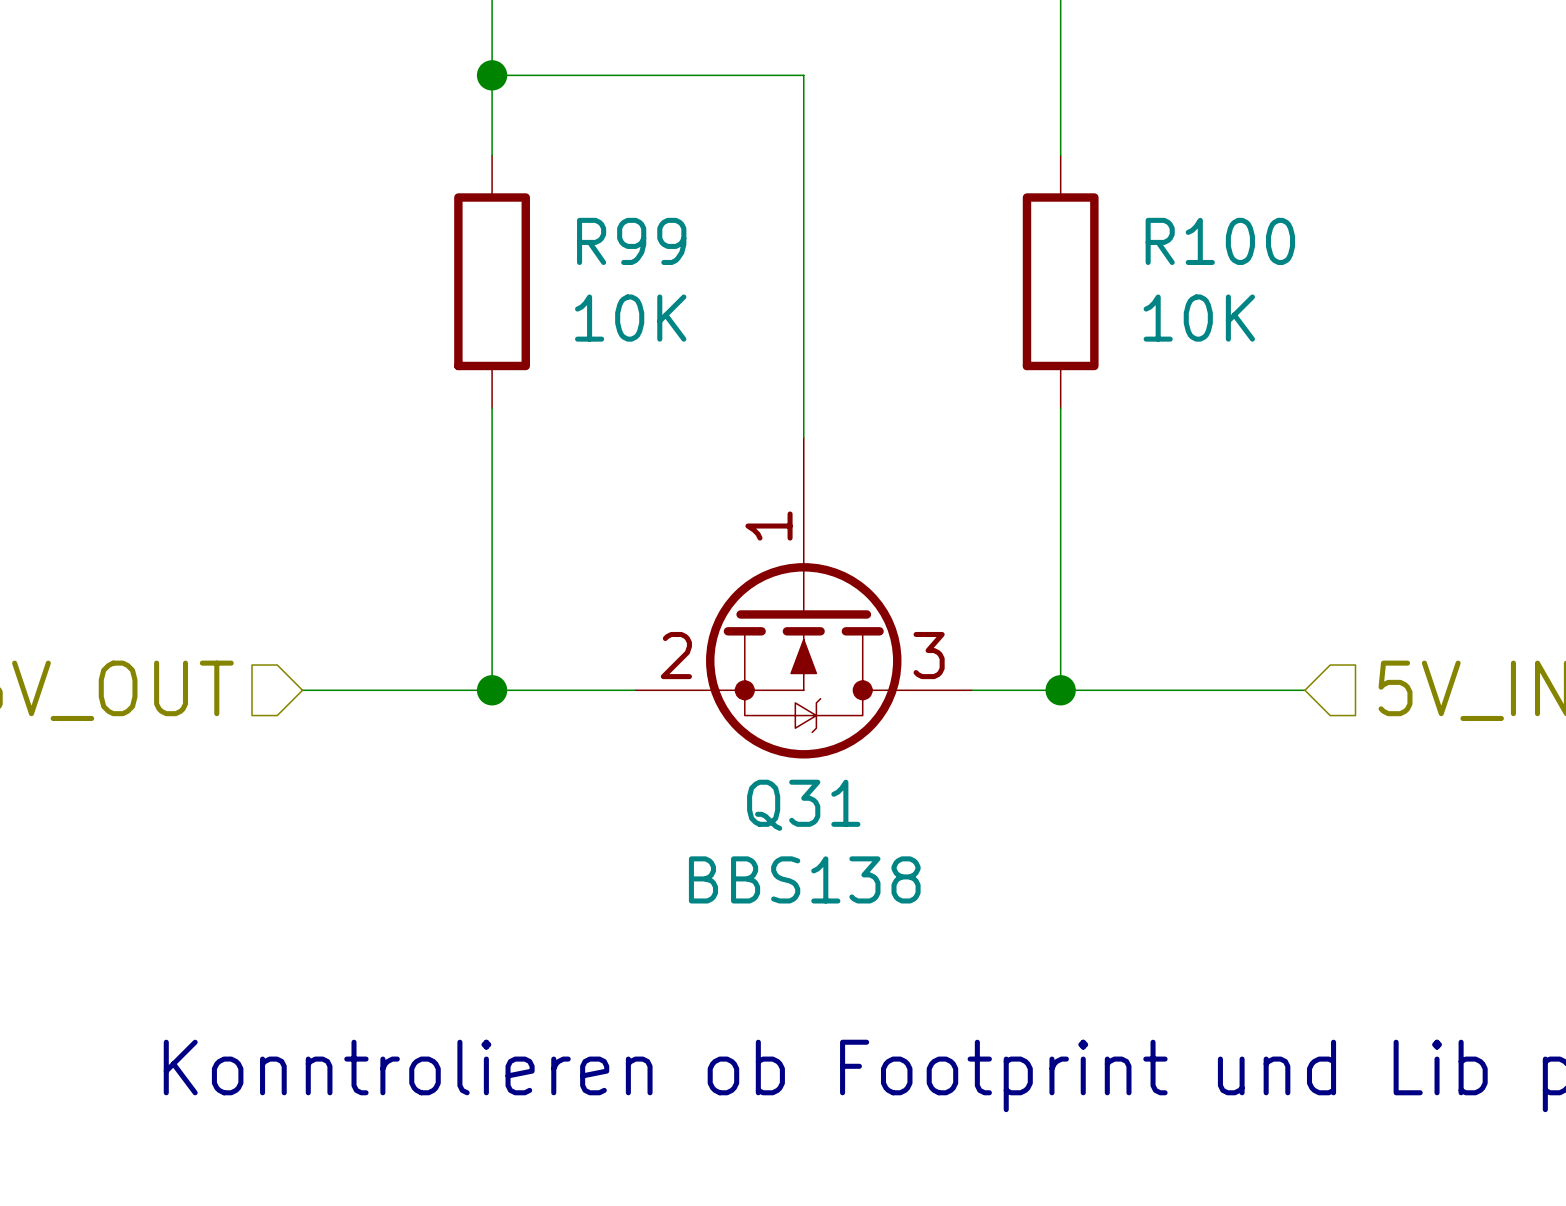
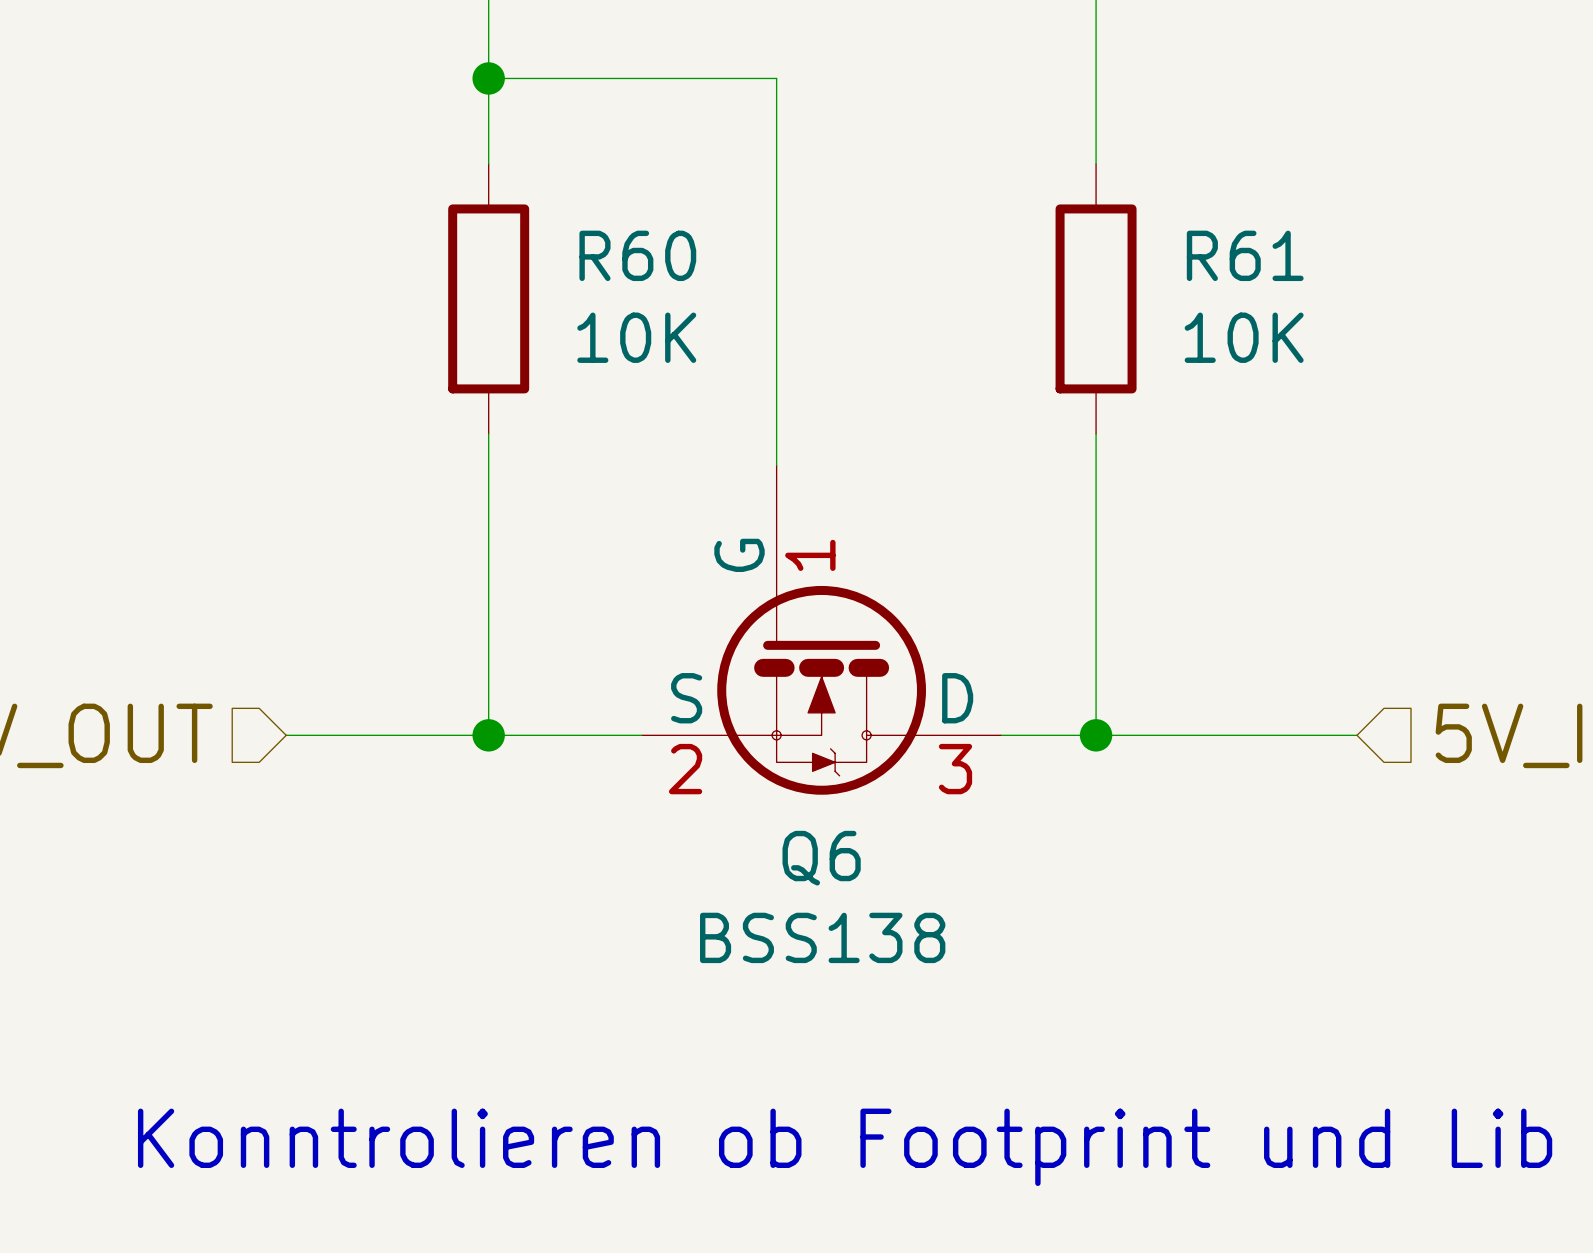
wire: (761, 75) (803, 75) (803, 437) -> (776, 78) (776, 465)
R99 name: R99 (631, 241) -> R60 (637, 255)
R100 name: R100 (1220, 241) -> R61 (1245, 255)
Q6: none -> BSS138 (821, 630)
Q31: BBS138 (803, 598) -> none

